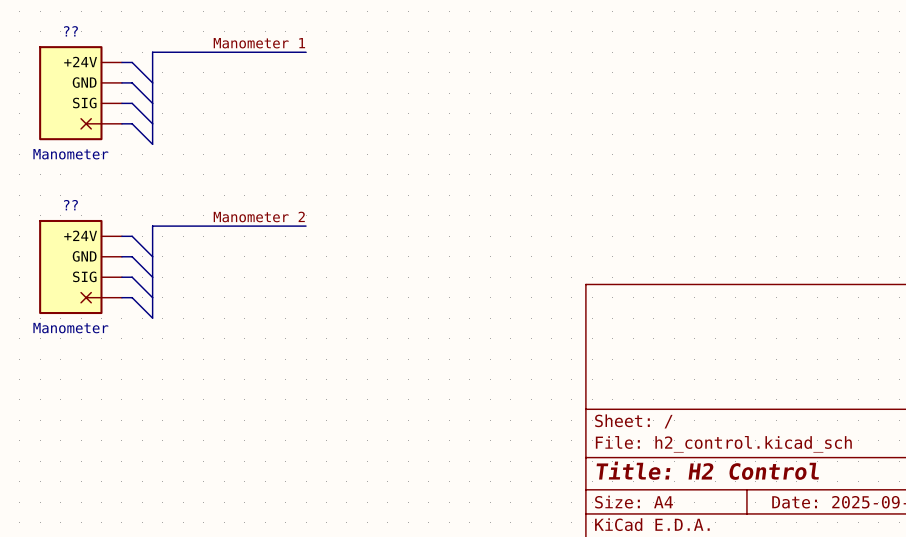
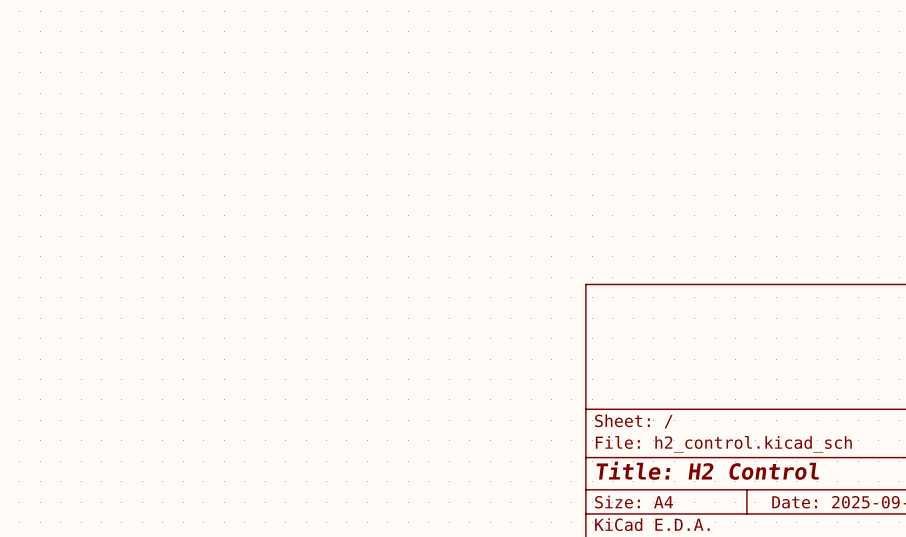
label: Manometer 1 (259, 43) -> none
bus: (306, 52) (152, 52) (152, 144) -> none
wire: (121, 62) (132, 62) (152, 82) -> none
wire: (121, 82) (132, 82) (152, 103) -> none
part: ?? (80, 93) -> none
wire: (121, 103) (132, 103) (152, 123) -> none
wire: (121, 123) (132, 123) (152, 144) -> none
label: Manometer 2 (259, 216) -> none
bus: (306, 226) (152, 226) (152, 318) -> none
wire: (121, 236) (132, 236) (152, 256) -> none
wire: (121, 256) (132, 256) (152, 277) -> none
part: ?? (80, 267) -> none
wire: (121, 277) (132, 277) (152, 297) -> none
wire: (121, 297) (132, 297) (152, 318) -> none

